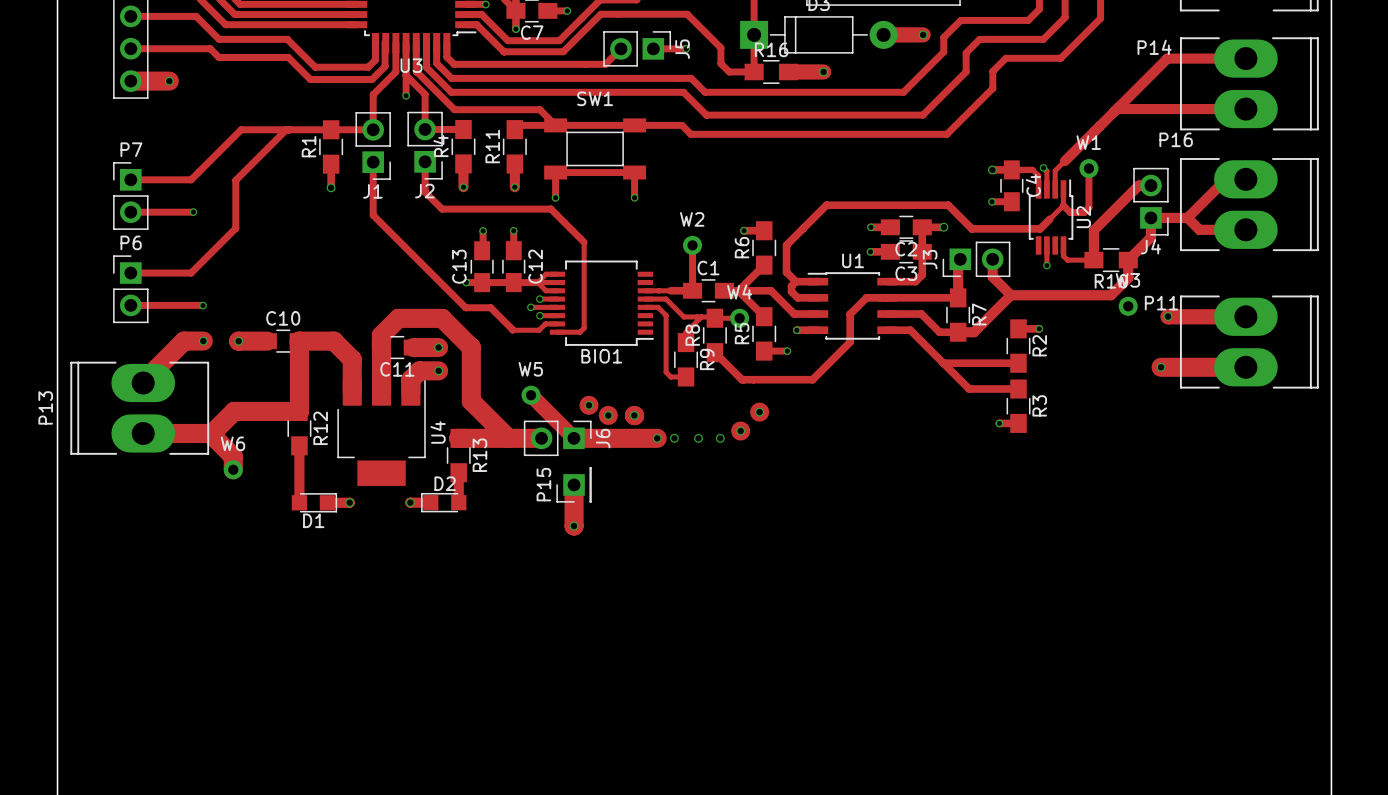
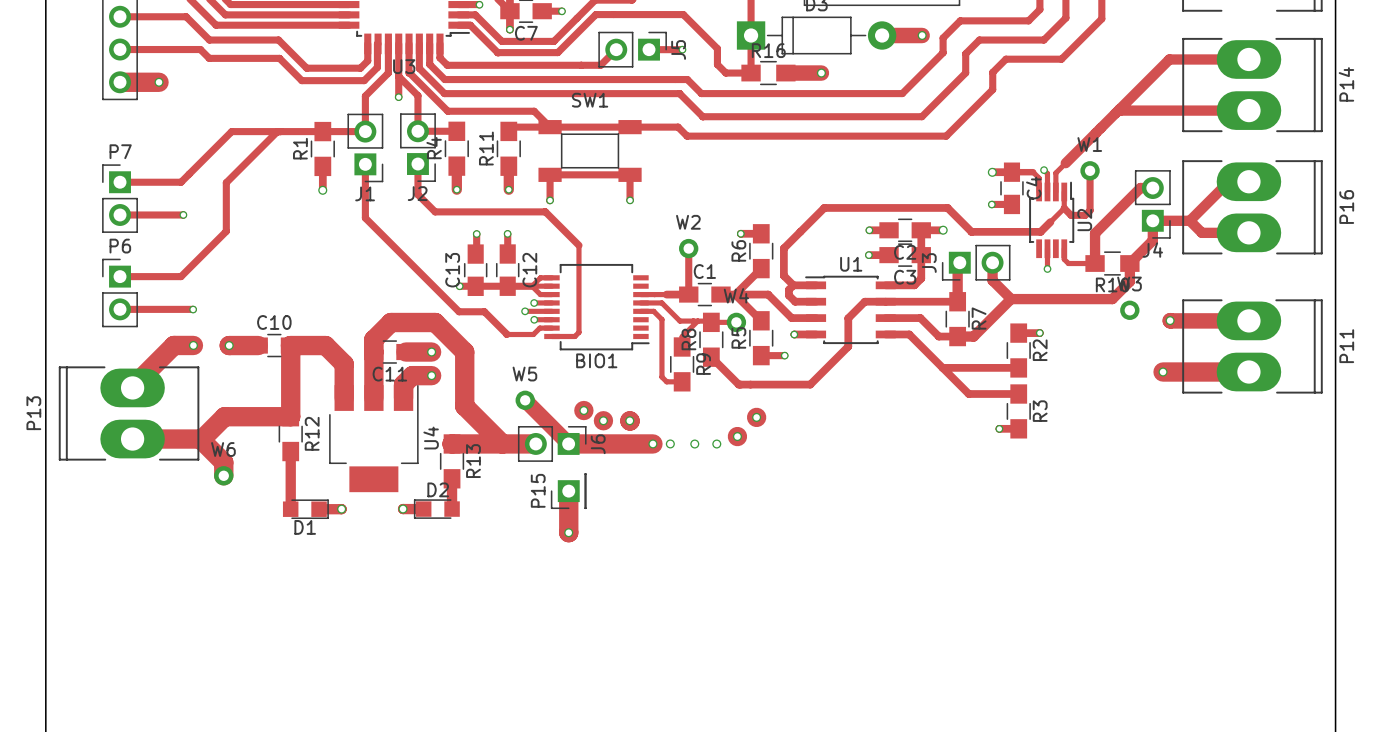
P14 name rotation: 0° (1154, 47) -> 90° counterclockwise (1346, 84)
P14 name position: P14 (1154, 47) -> P14 (1346, 84)
P16 name rotation: 0° (1176, 139) -> 90° counterclockwise (1346, 206)
P16 name position: P16 (1176, 139) -> P16 (1346, 206)
P11 name rotation: 0° (1161, 303) -> 90° counterclockwise (1346, 346)
P11 name position: P11 (1161, 303) -> P11 (1346, 346)

